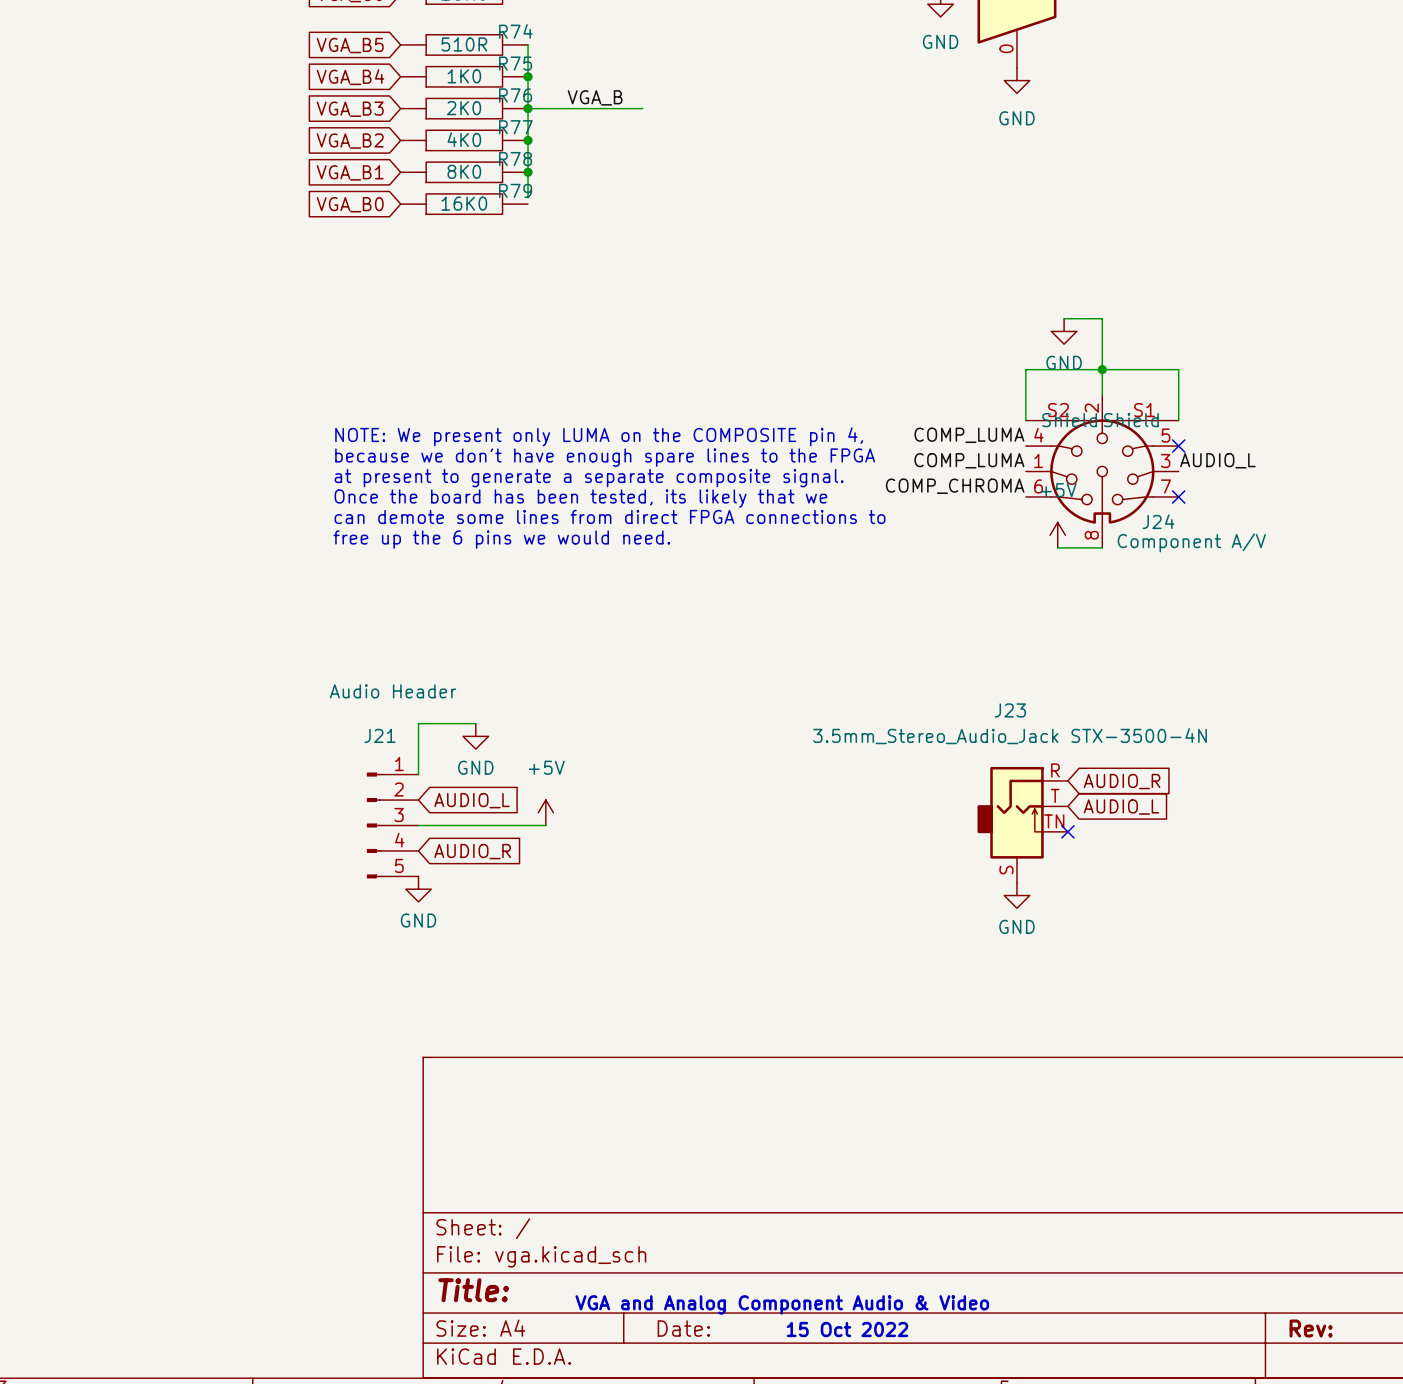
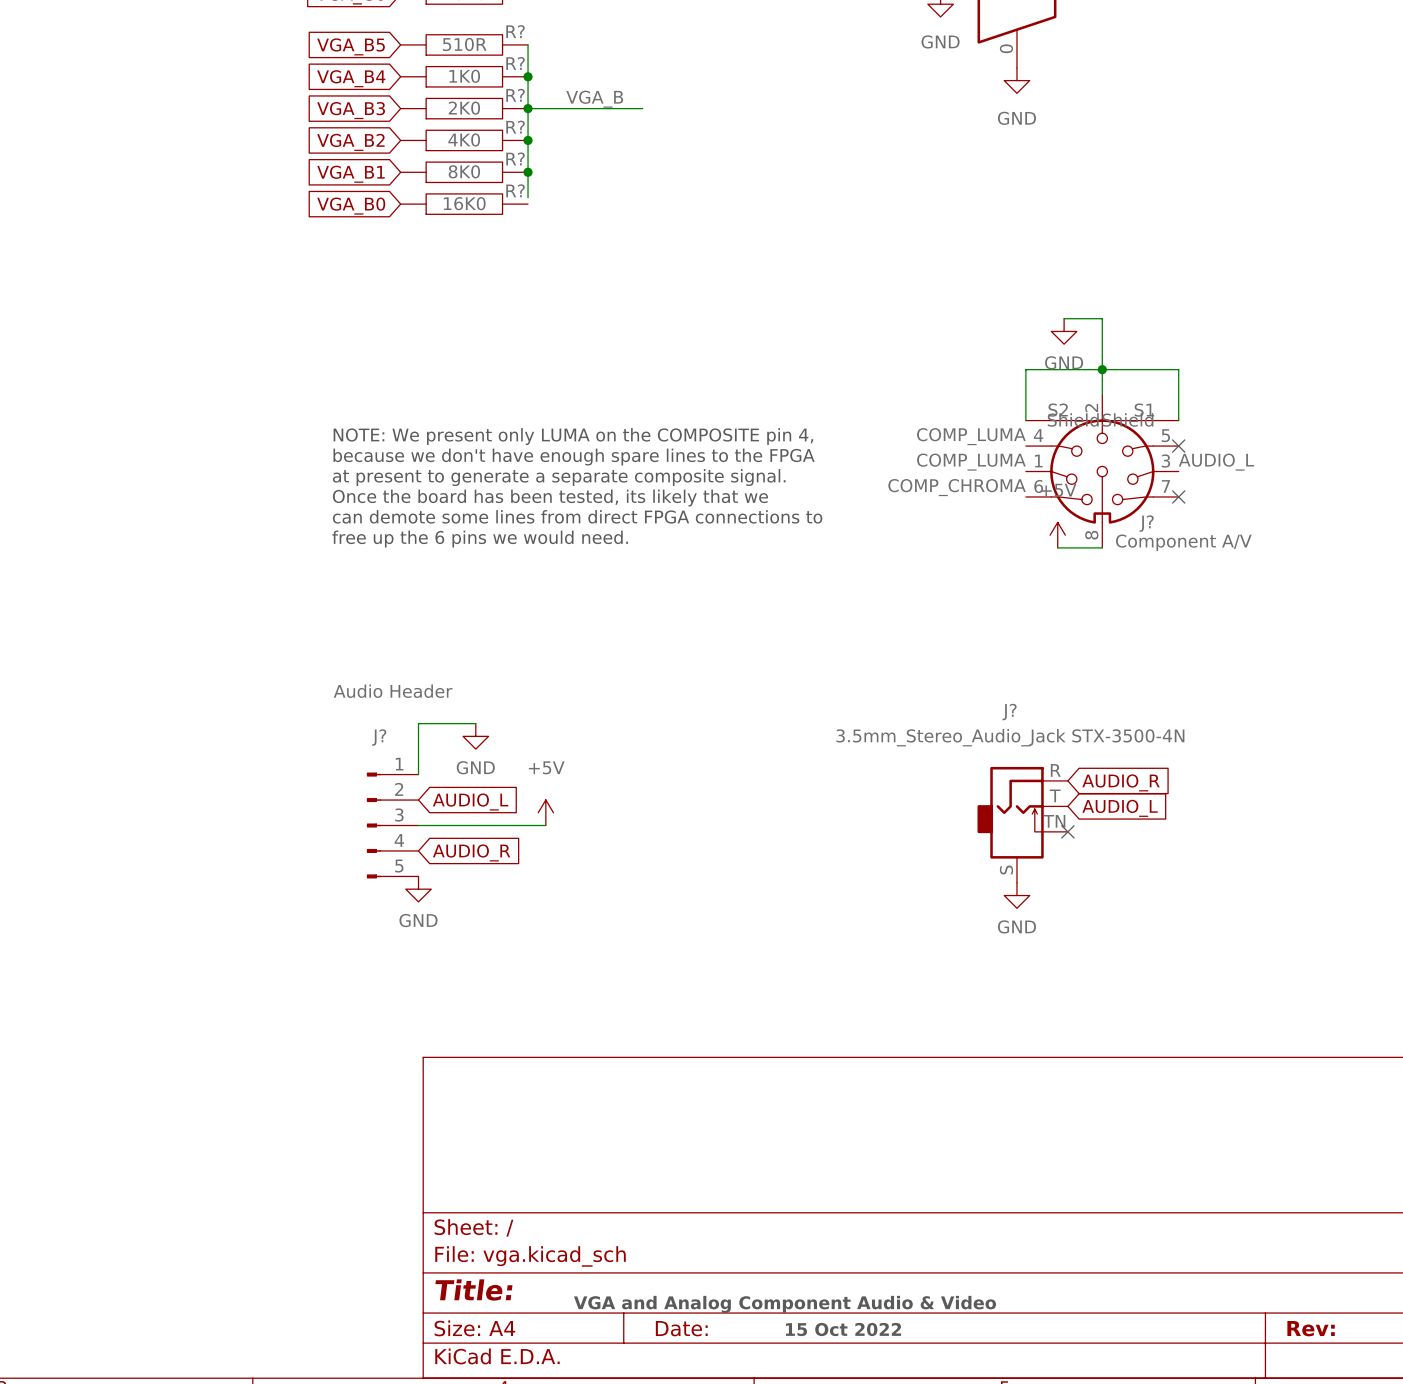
R74 name: R74 (515, 31) -> R? (515, 31)
R75 name: R75 (515, 63) -> R? (515, 63)
R76 name: R76 (515, 95) -> R? (515, 95)
R77 name: R77 (515, 127) -> R? (515, 127)
R78 name: R78 (515, 159) -> R? (515, 158)
R79 name: R79 (515, 190) -> R? (515, 190)
J24 name: J24 (1158, 521) -> J? (1146, 523)
J23 name: J23 (1010, 710) -> J? (1009, 712)
J21 name: J21 (380, 735) -> J? (379, 737)

